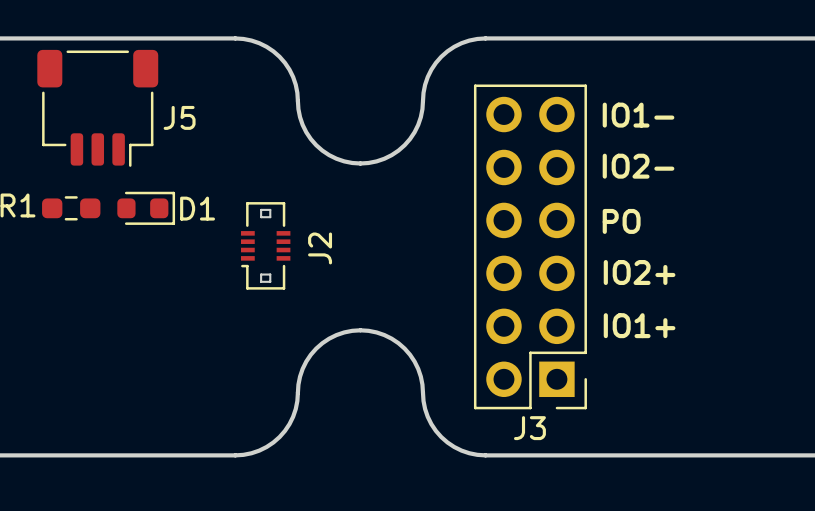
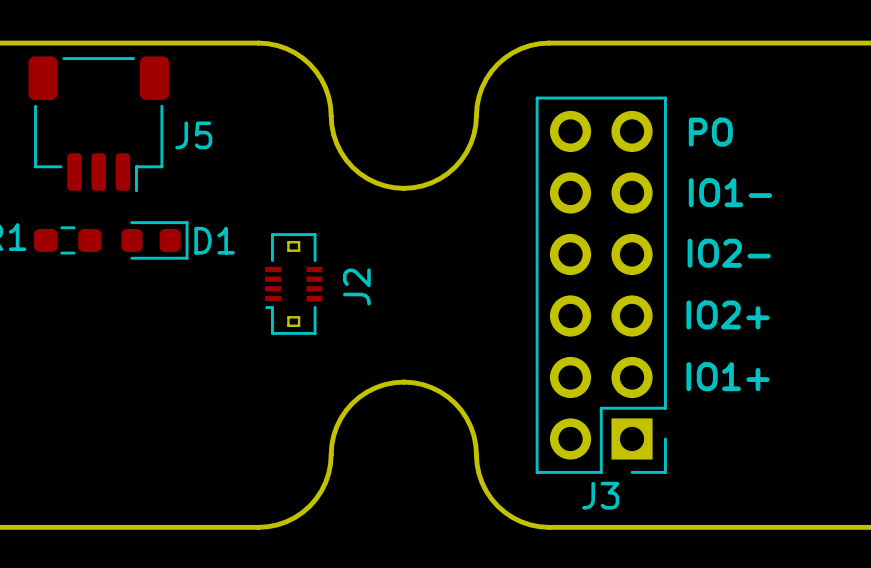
text: IO1- (638, 115) -> PO (710, 132)
text: IO2- (638, 166) -> IO1- (730, 192)
text: PO (621, 221) -> IO2- (729, 253)

